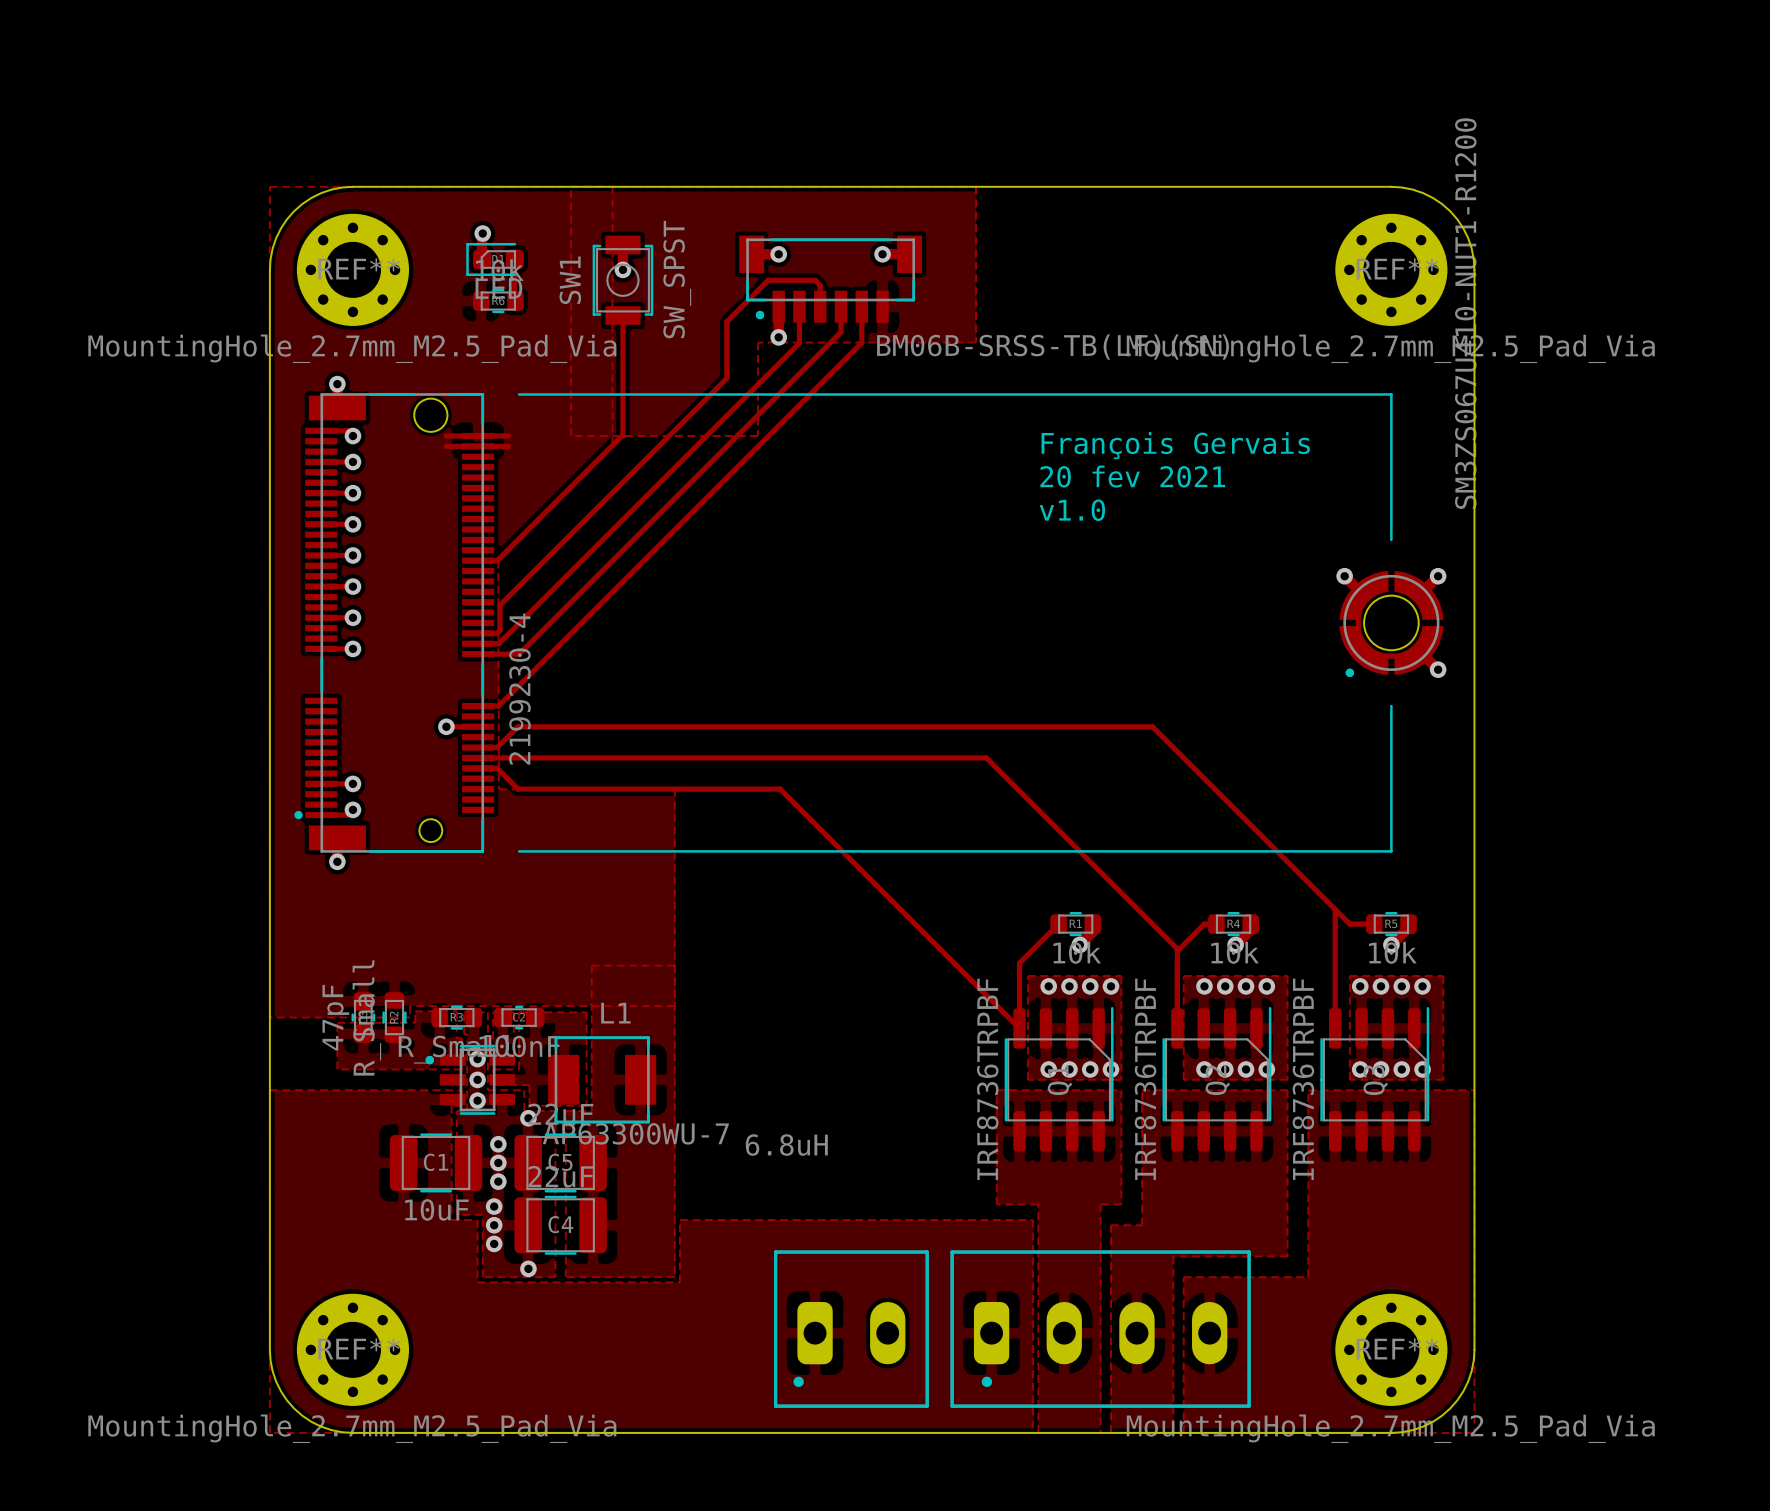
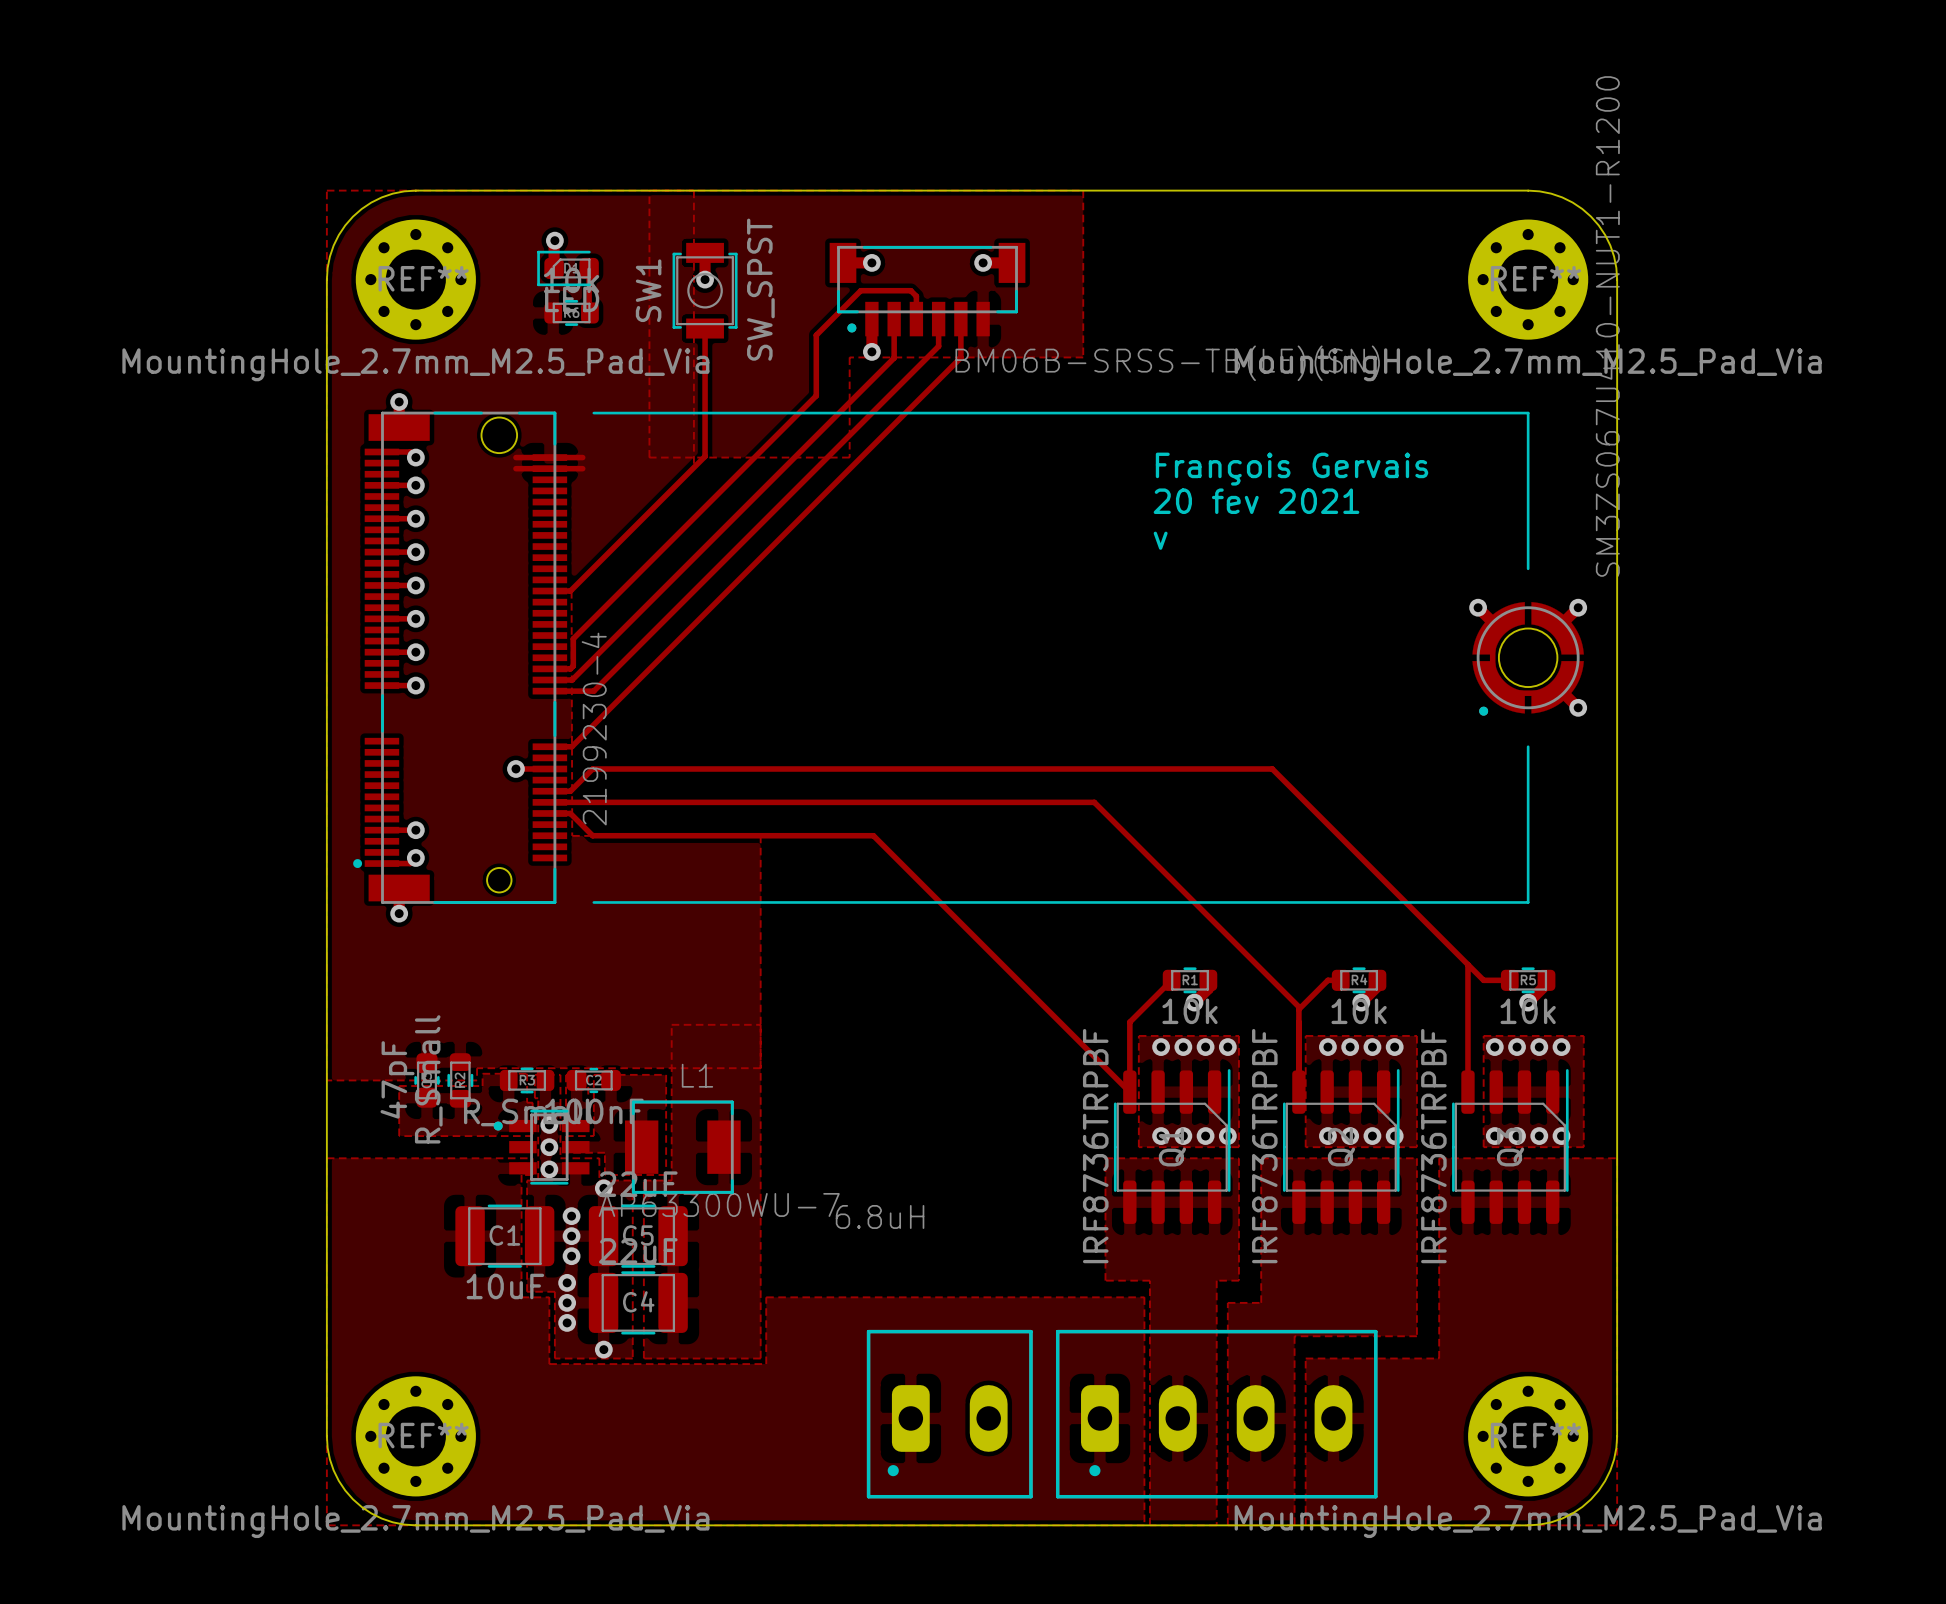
text: v1.0 (1072, 510) -> v (1160, 540)

